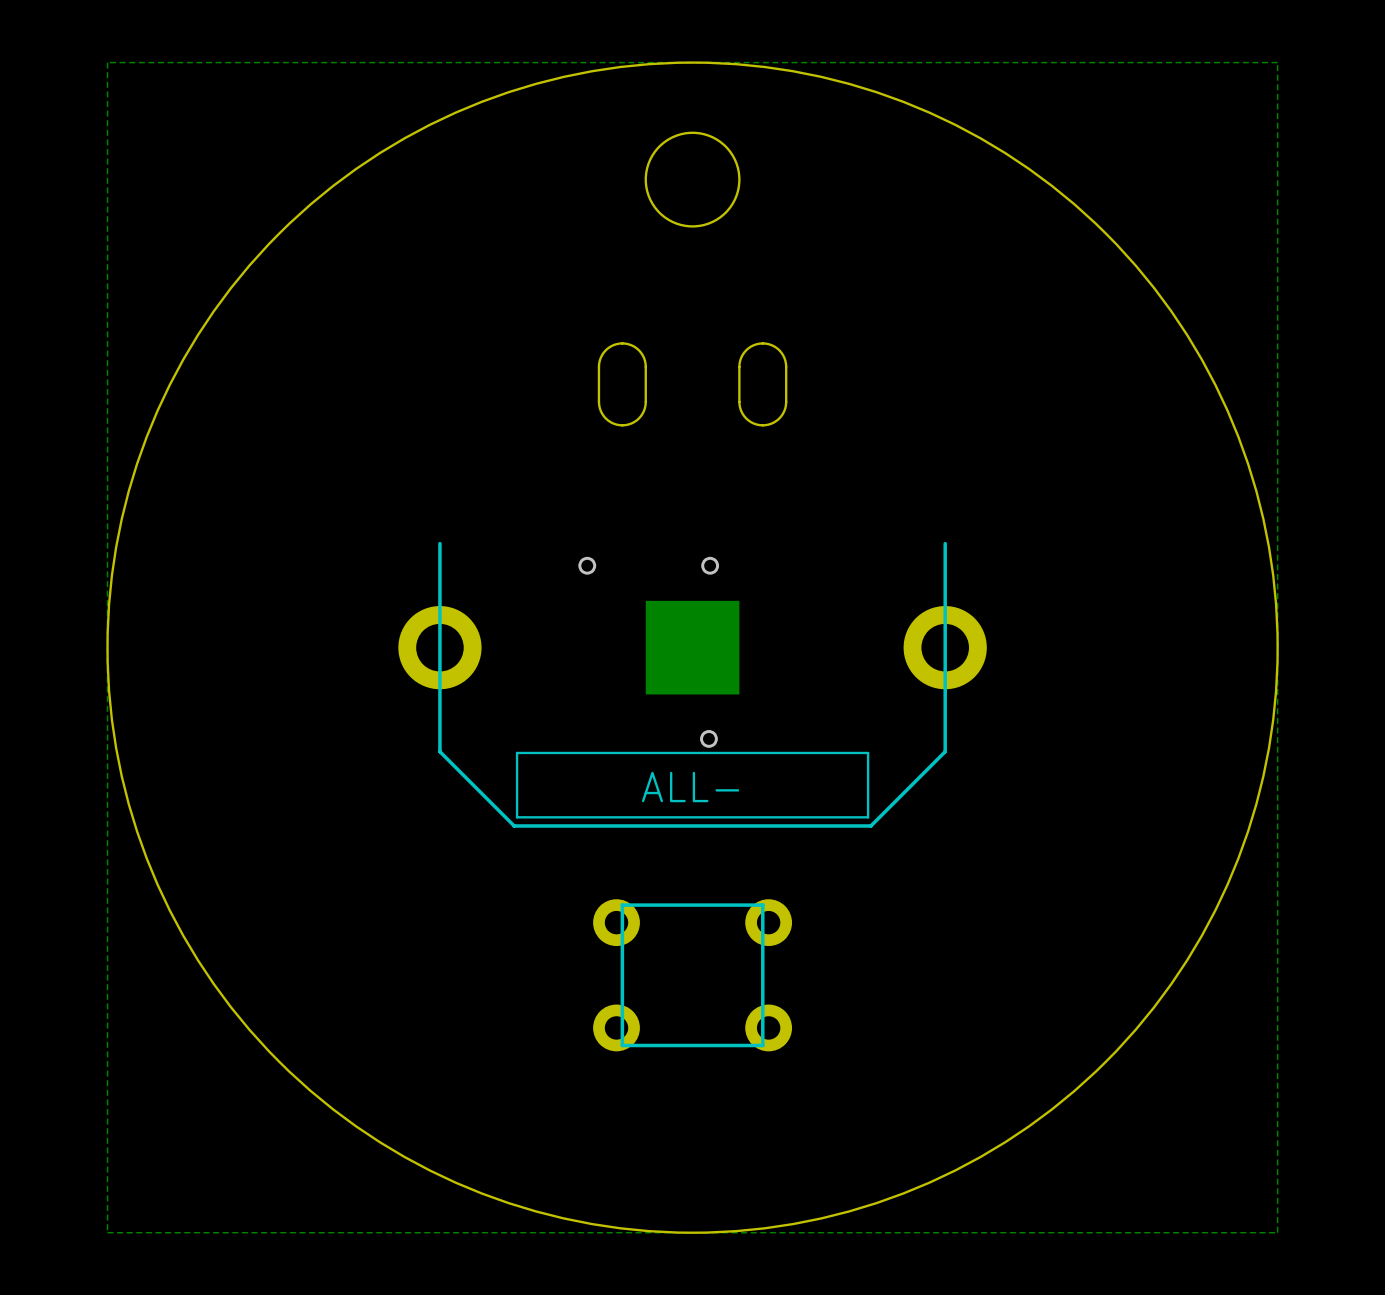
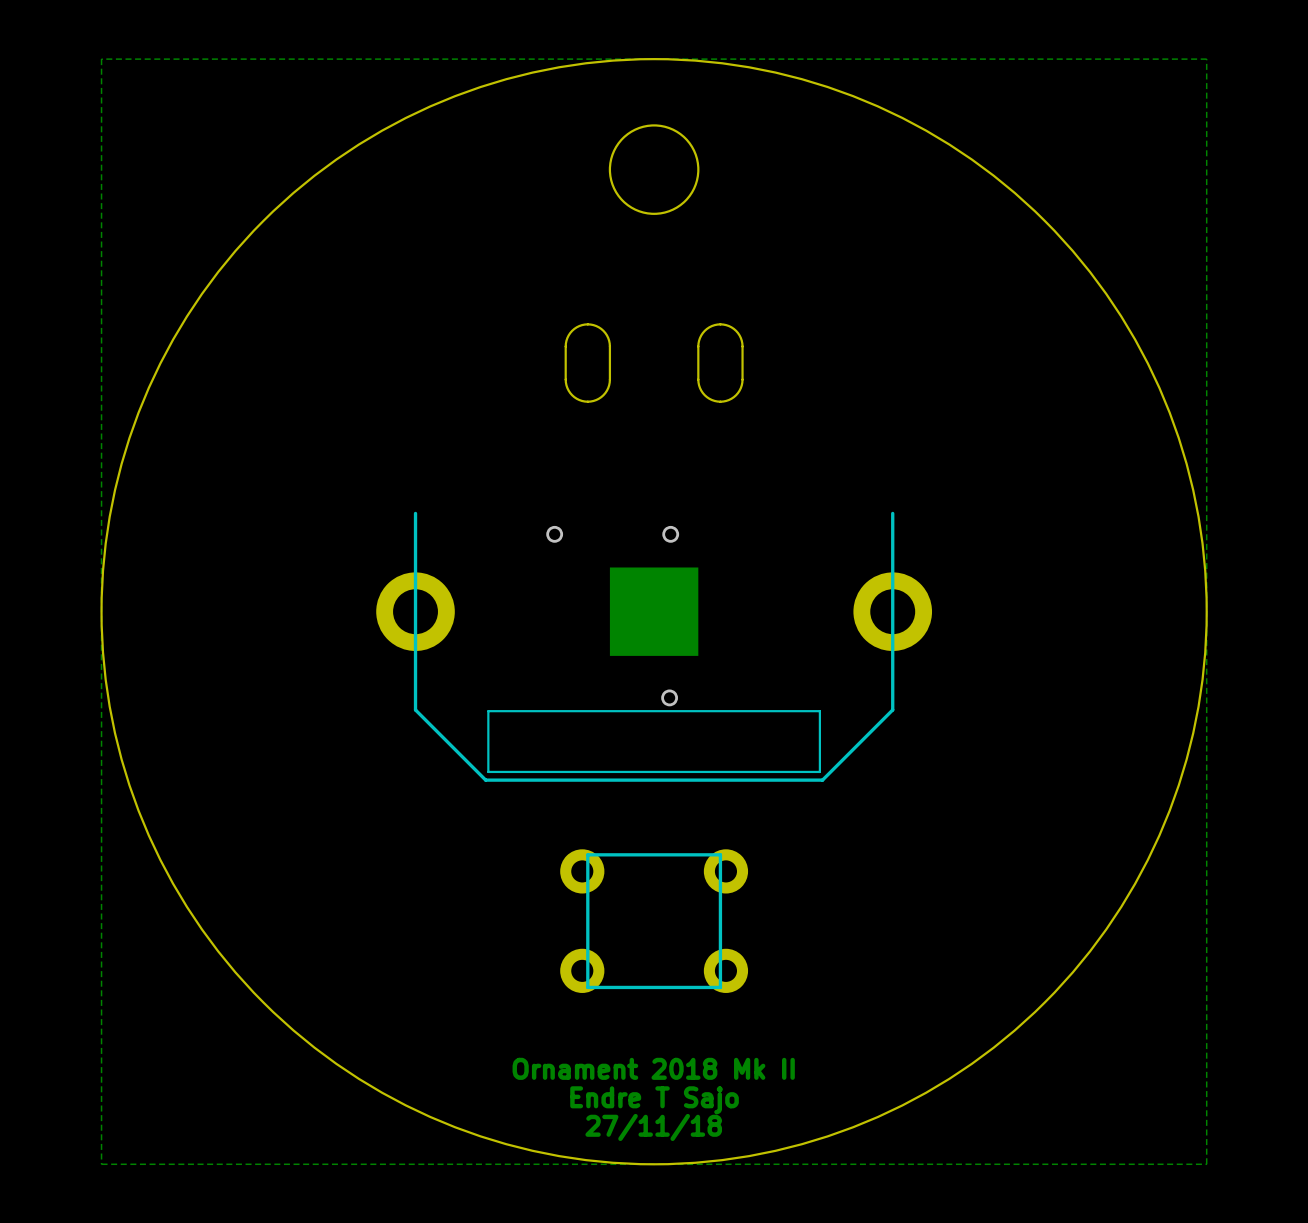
text: ALL- (690, 787) -> none
text: none -> Ornament 2018 Mk II (653, 1068)
text: none -> Endre T Sajo (654, 1100)
text: none -> 27/11/18 (653, 1127)

